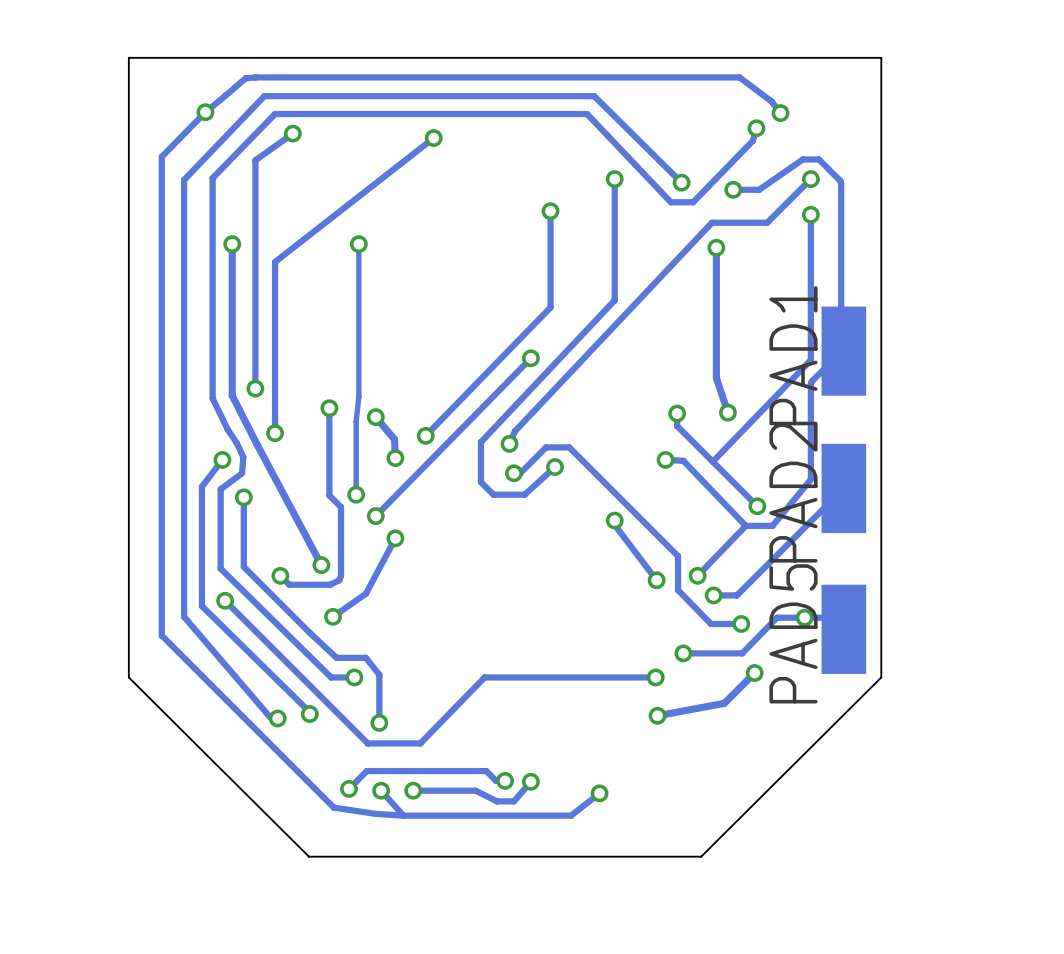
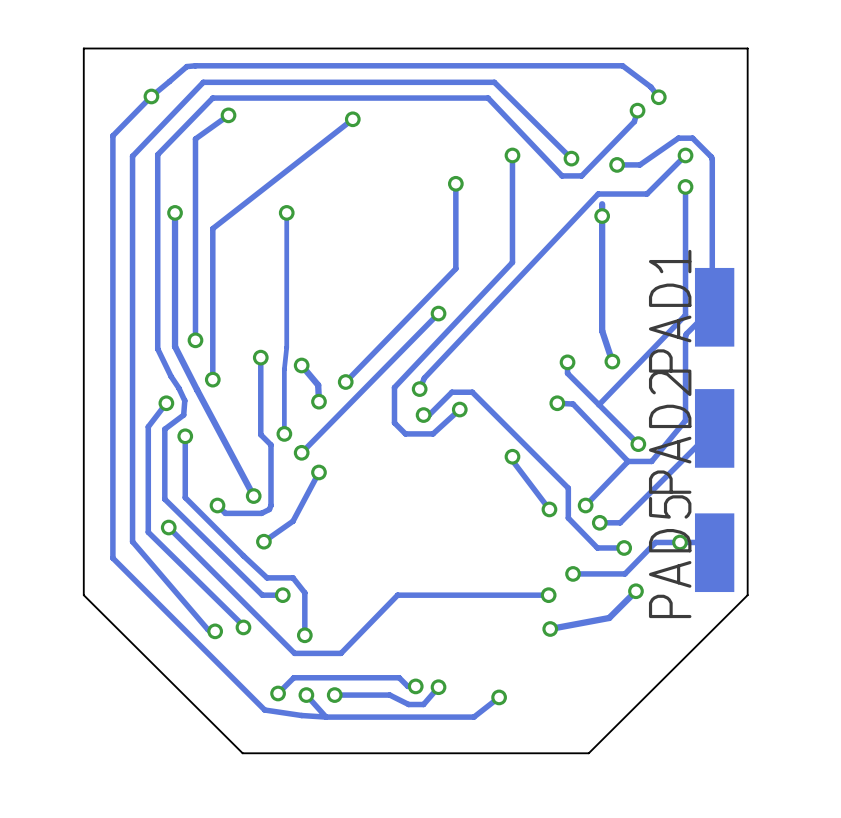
track: none -> (602, 204) (602, 216)

